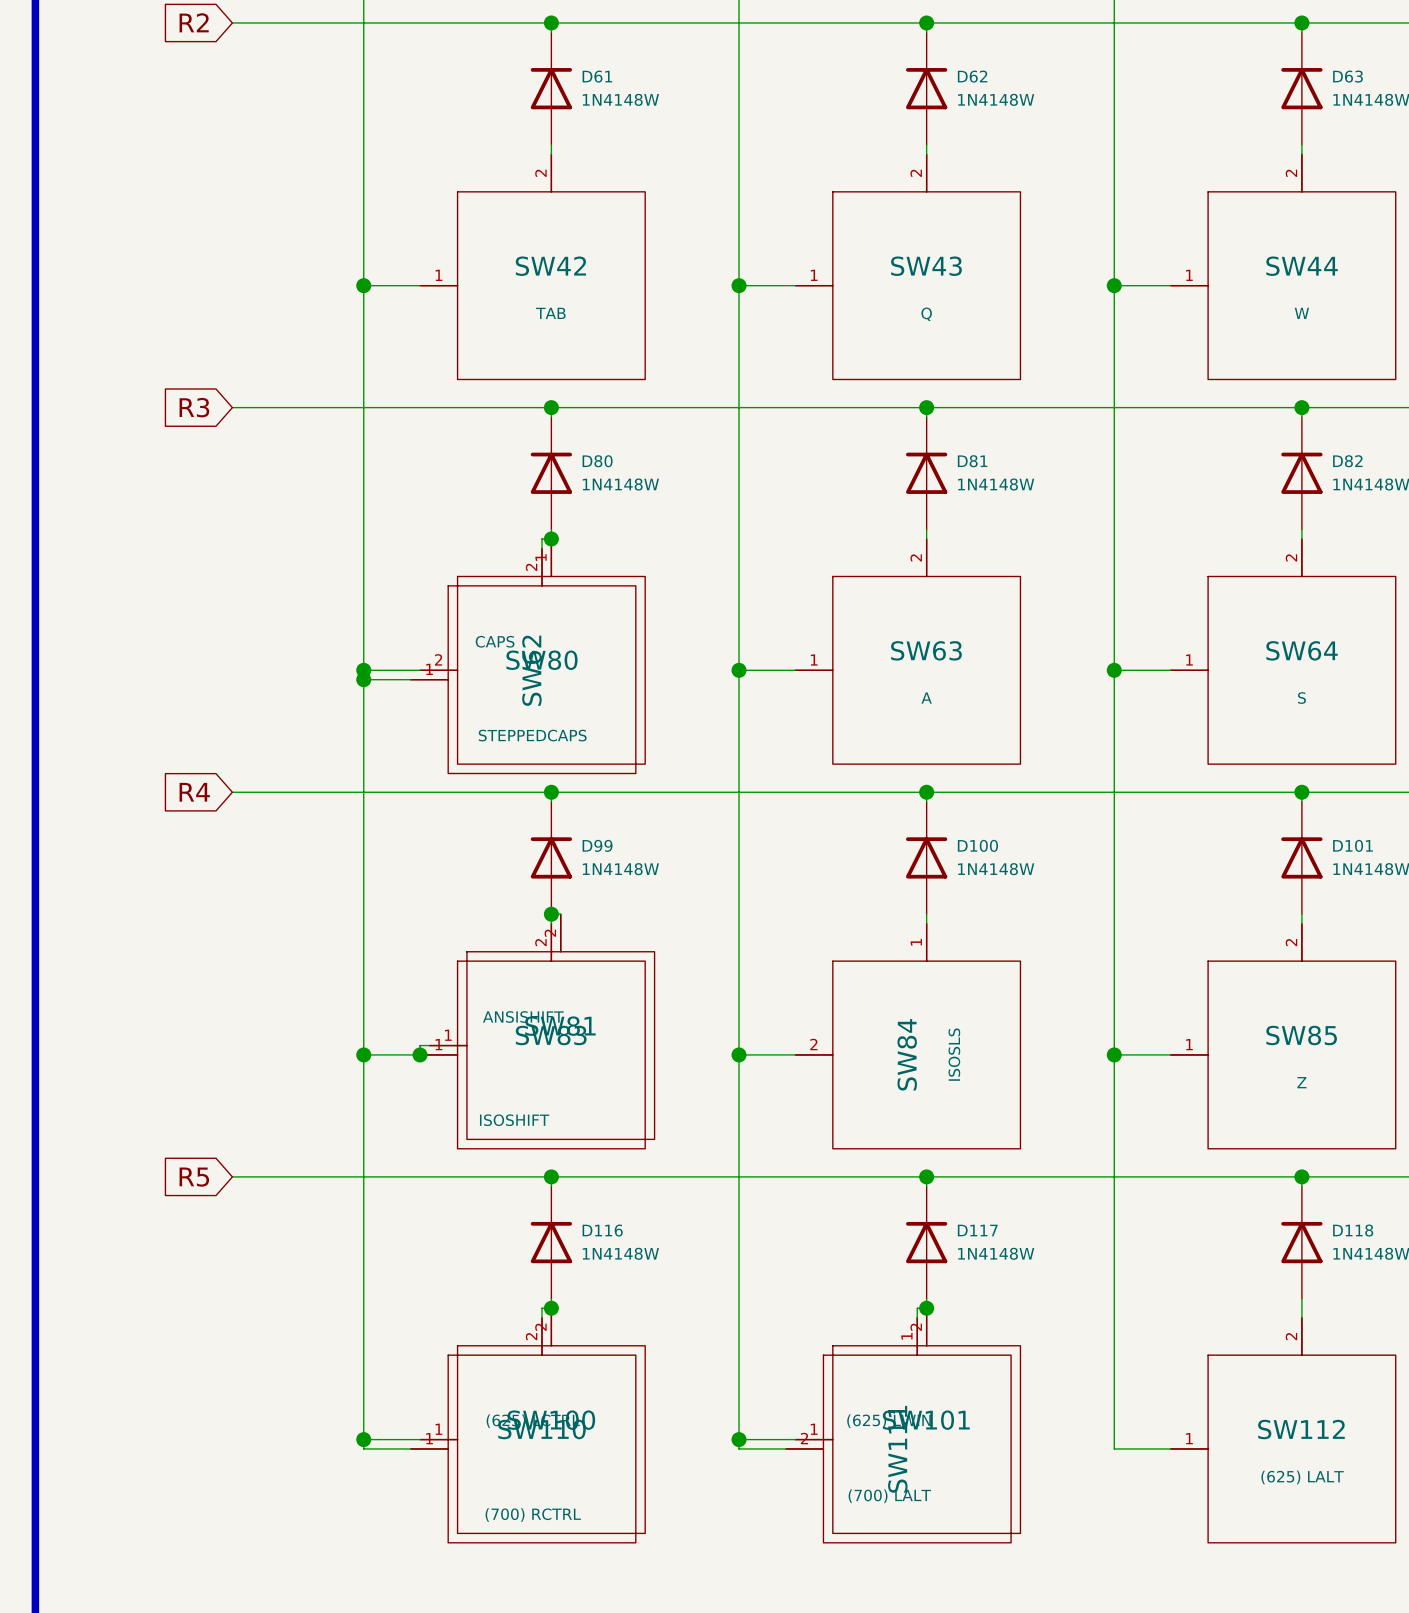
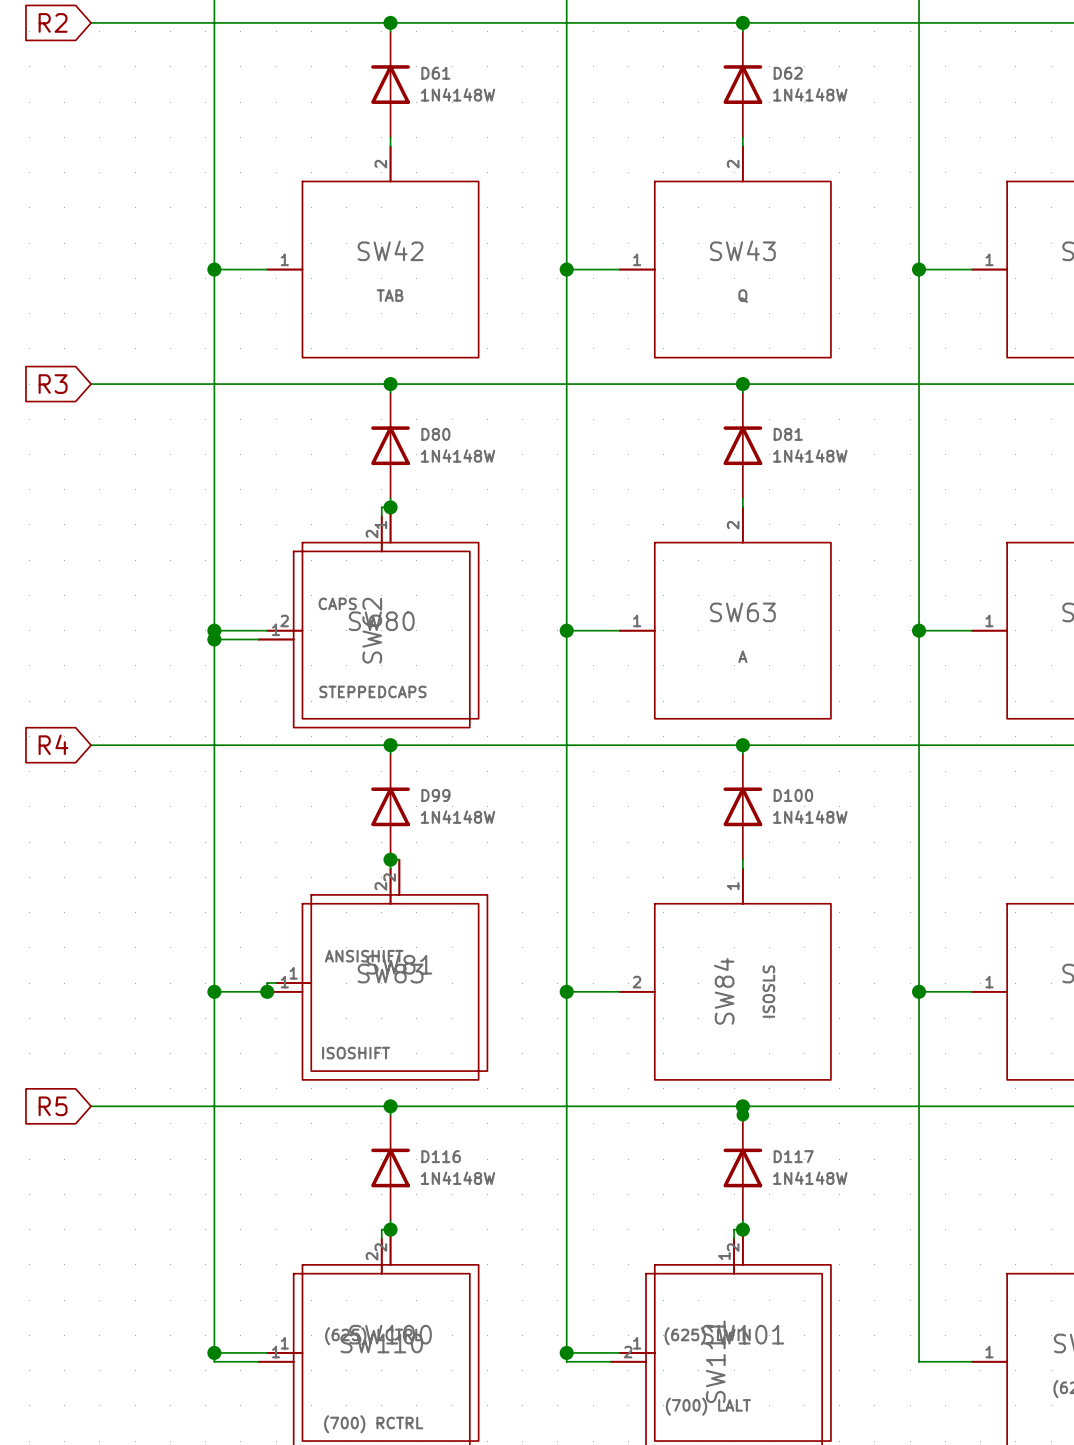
junction: none -> (742, 1115)

